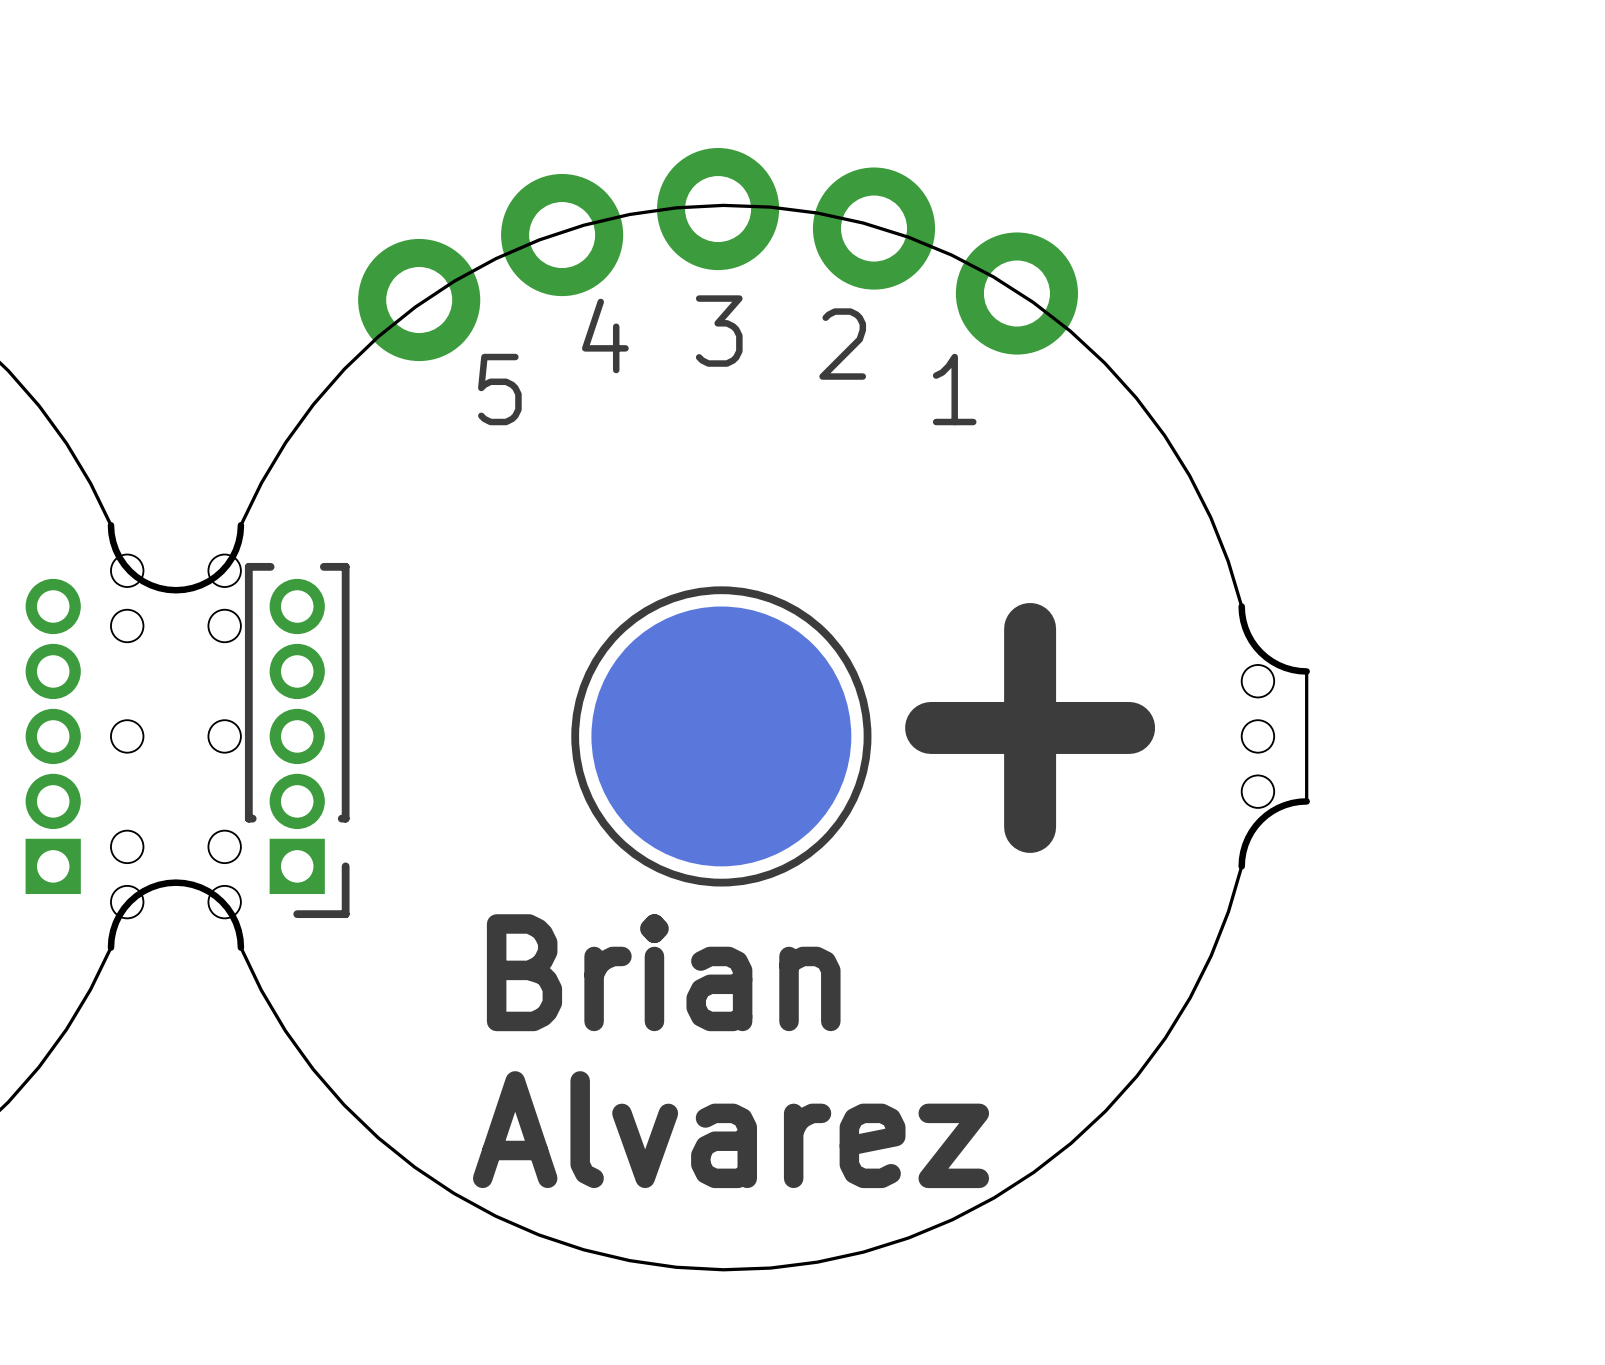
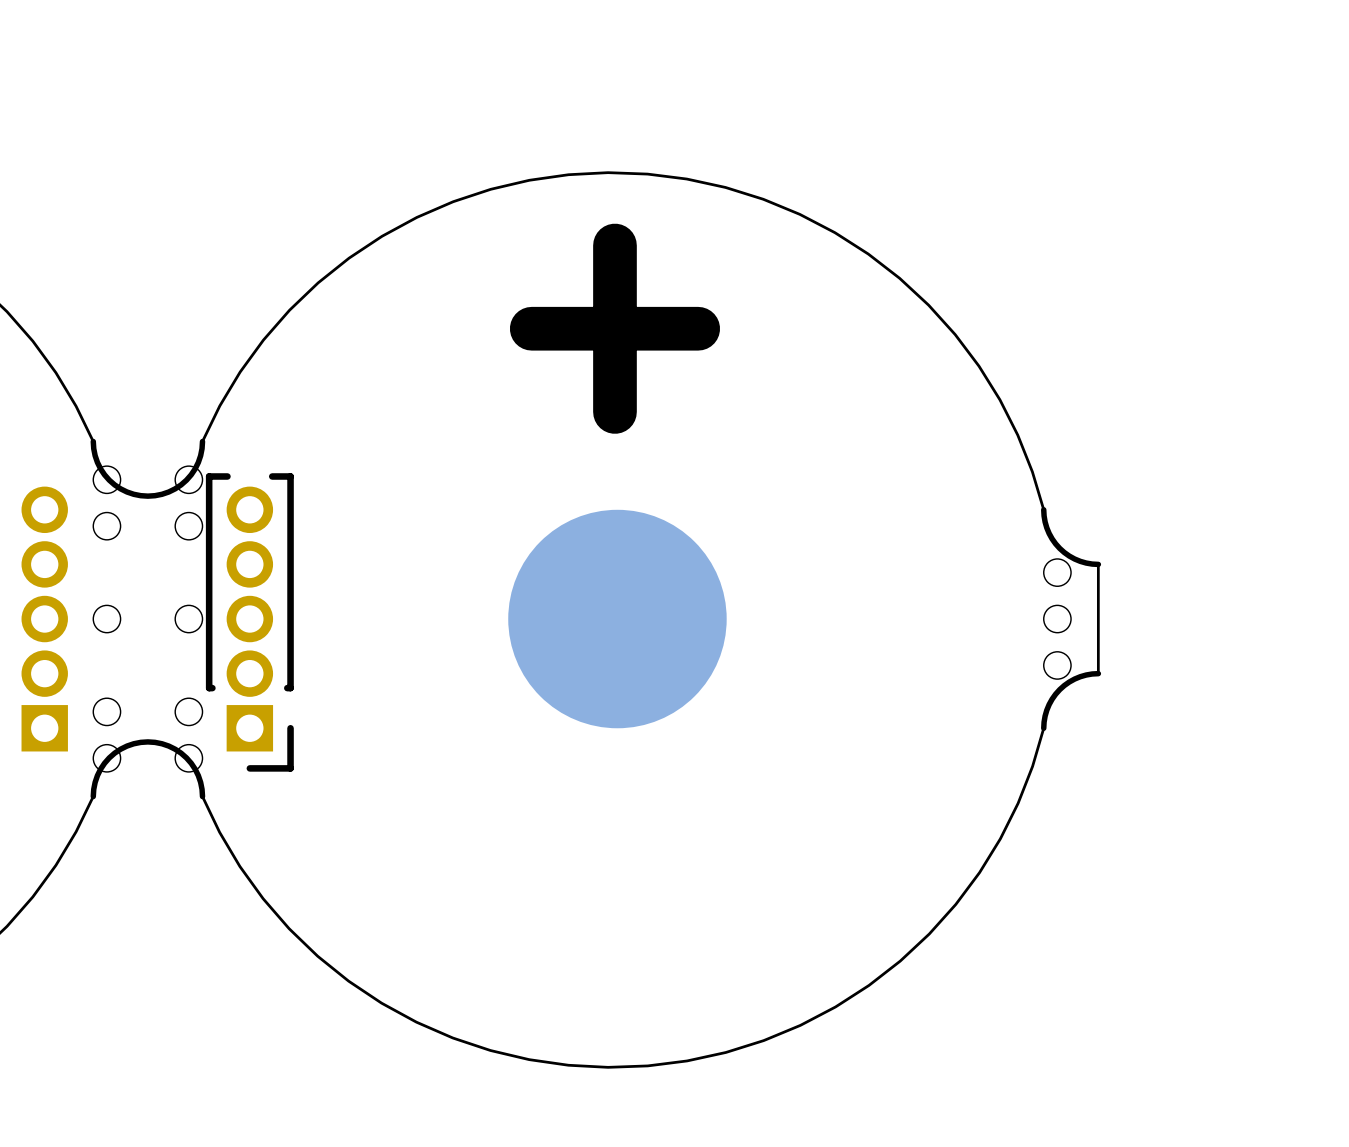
part: (718, 209) -> none
part: (874, 228) -> none
part: (562, 235) -> none
part: (1016, 293) -> none
part: (419, 300) -> none
text: 3 (719, 331) -> none
text: 4 (605, 336) -> none
text: 2 (842, 344) -> none
text: 5 (499, 389) -> none
text: 1 (954, 389) -> none
text position: + (1030, 727) -> + (614, 328)
part side: bottom (721, 736) -> top (617, 619)
text: Brian (663, 972) -> none
text: Alvarez (731, 1129) -> none

